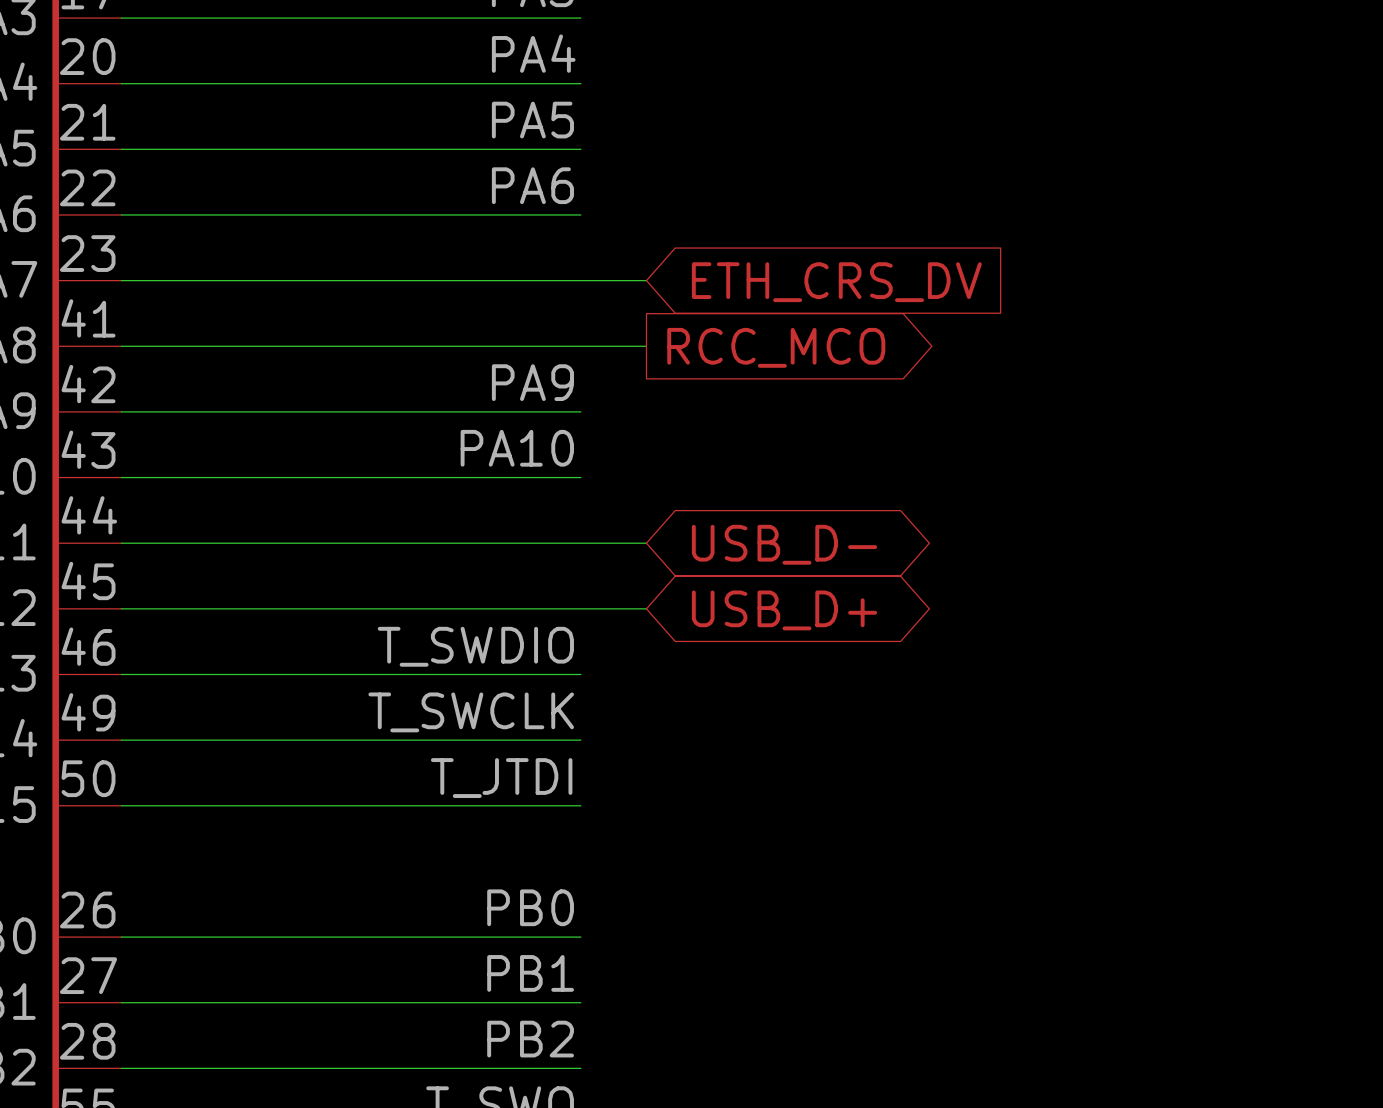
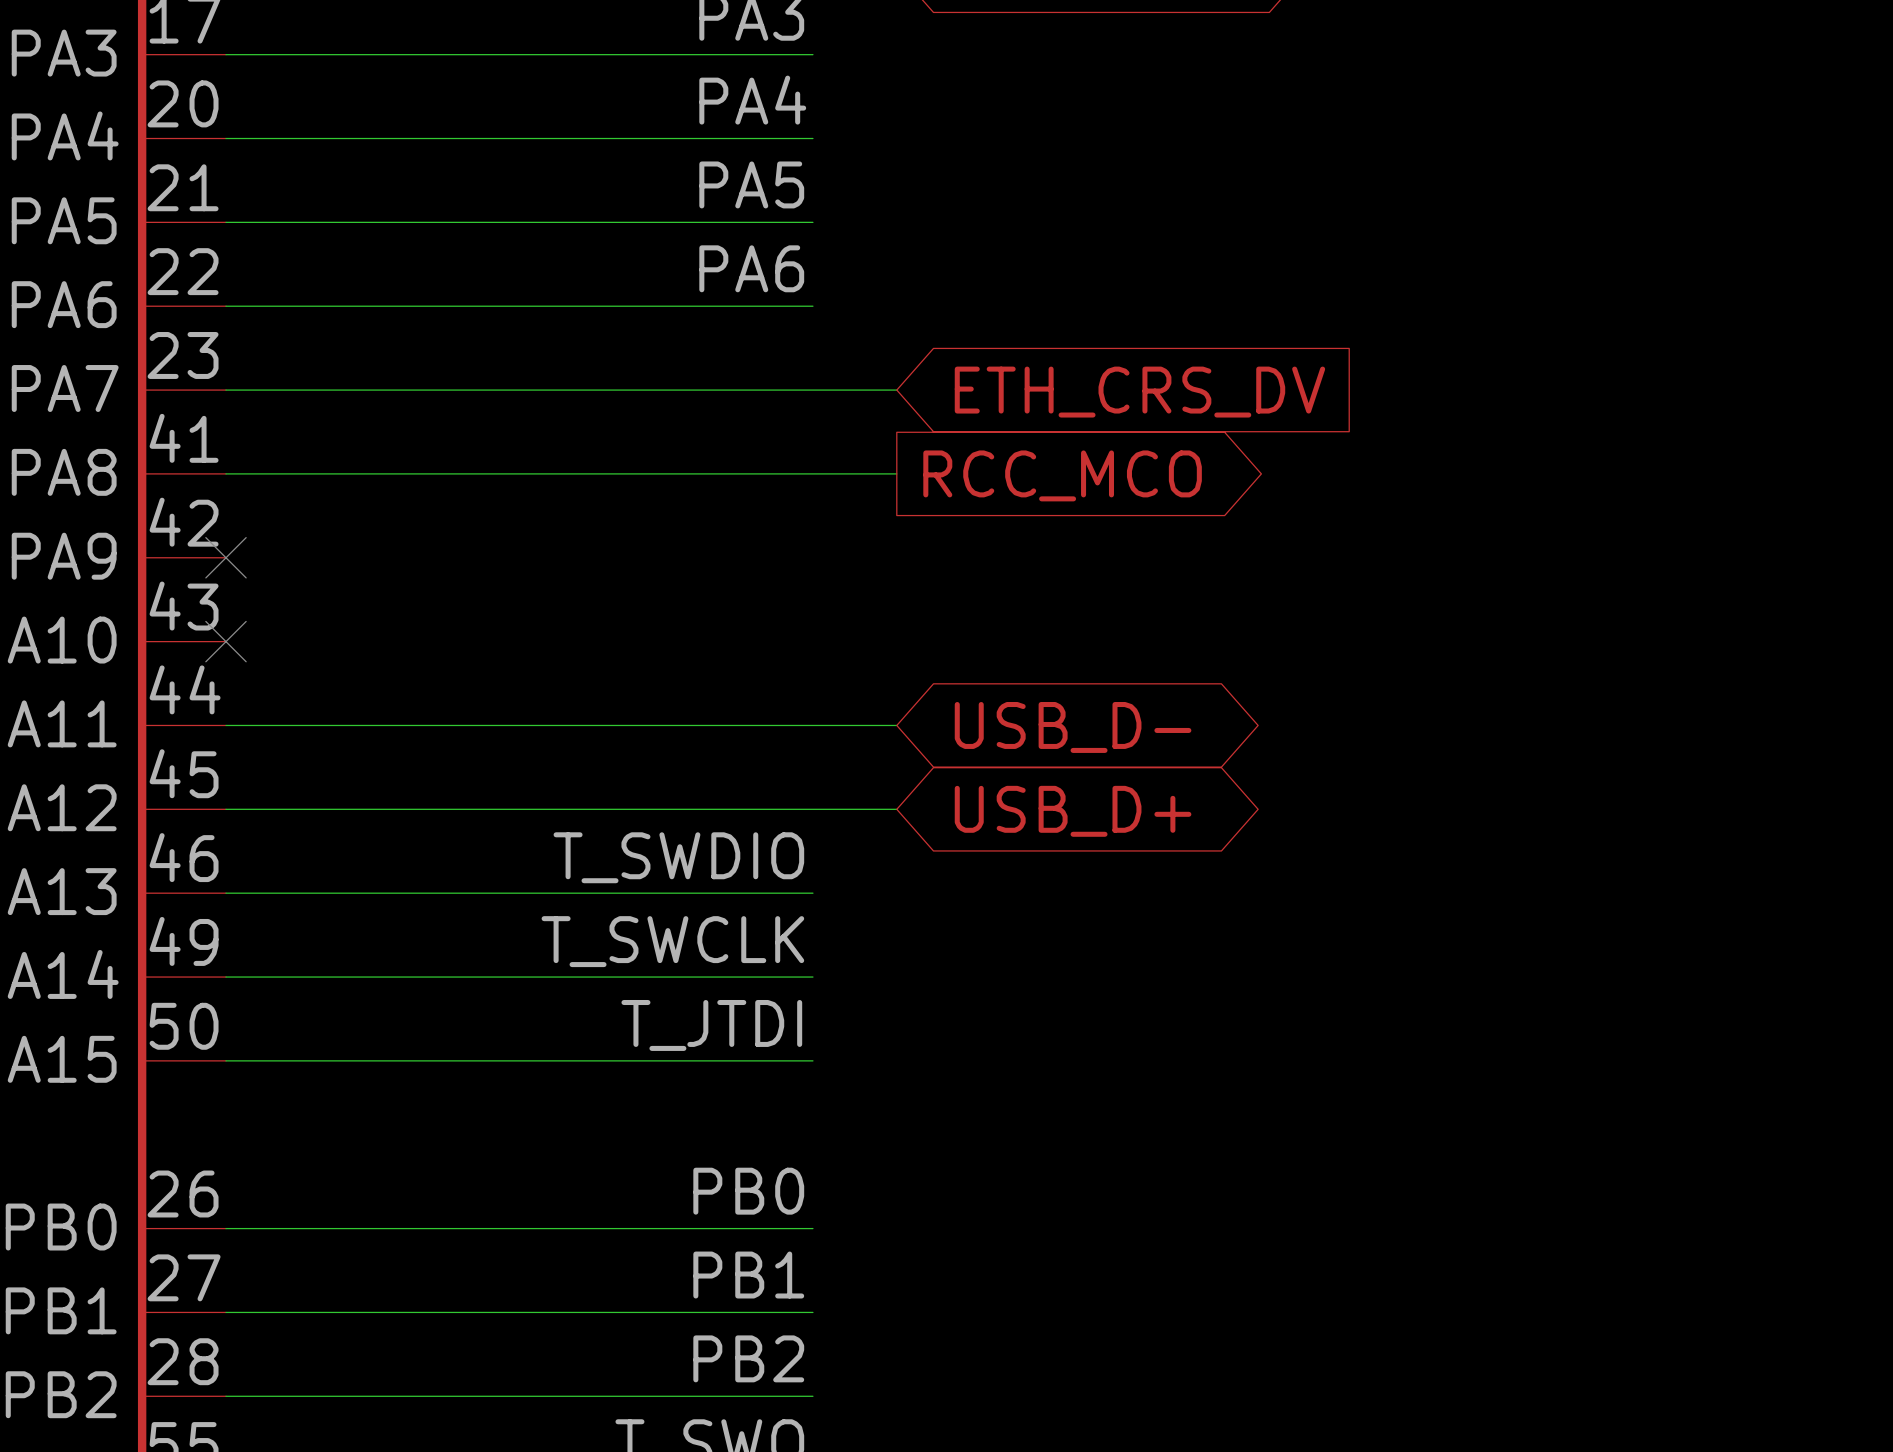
label: PA9 (532, 382) -> none
wire: (121, 411) (580, 411) -> none
no-connect mark: none -> (225, 557)
label: PA10 (517, 448) -> none
wire: (121, 477) (580, 477) -> none
no-connect mark: none -> (225, 641)

